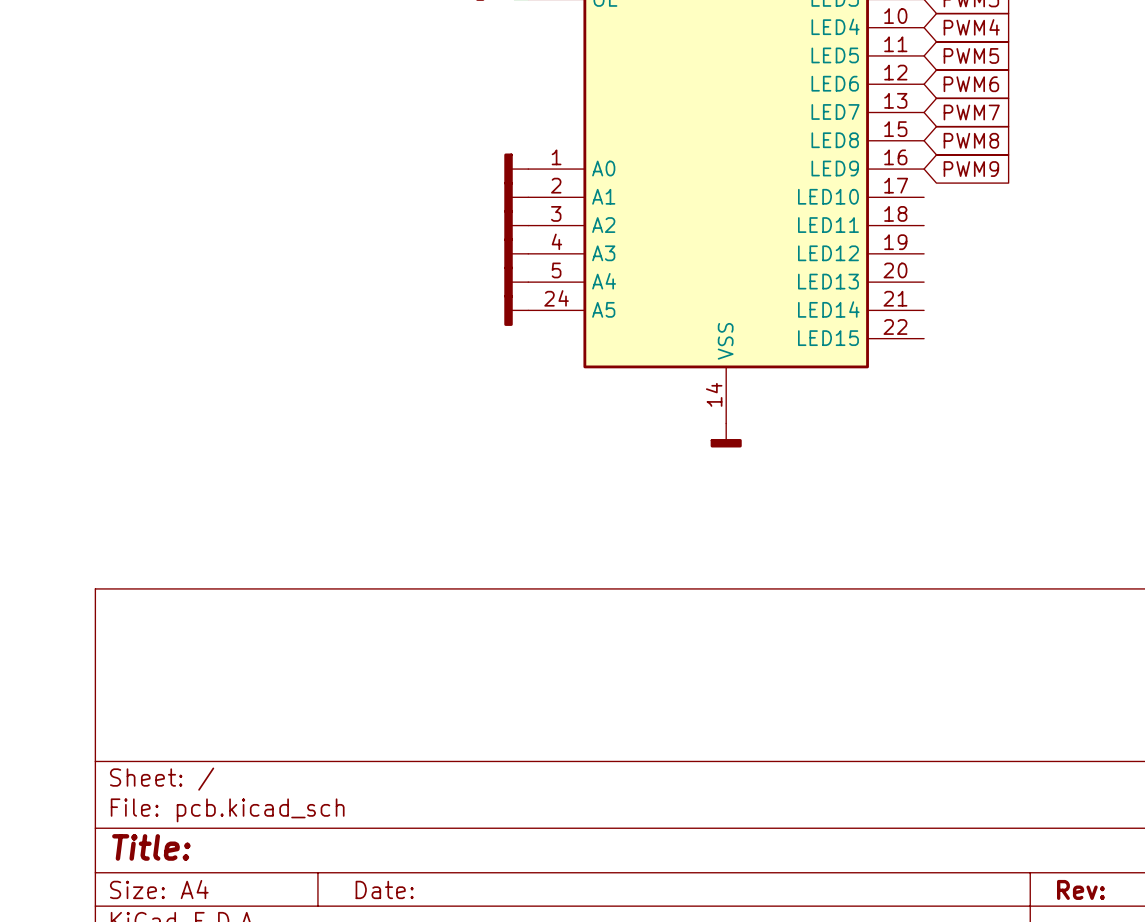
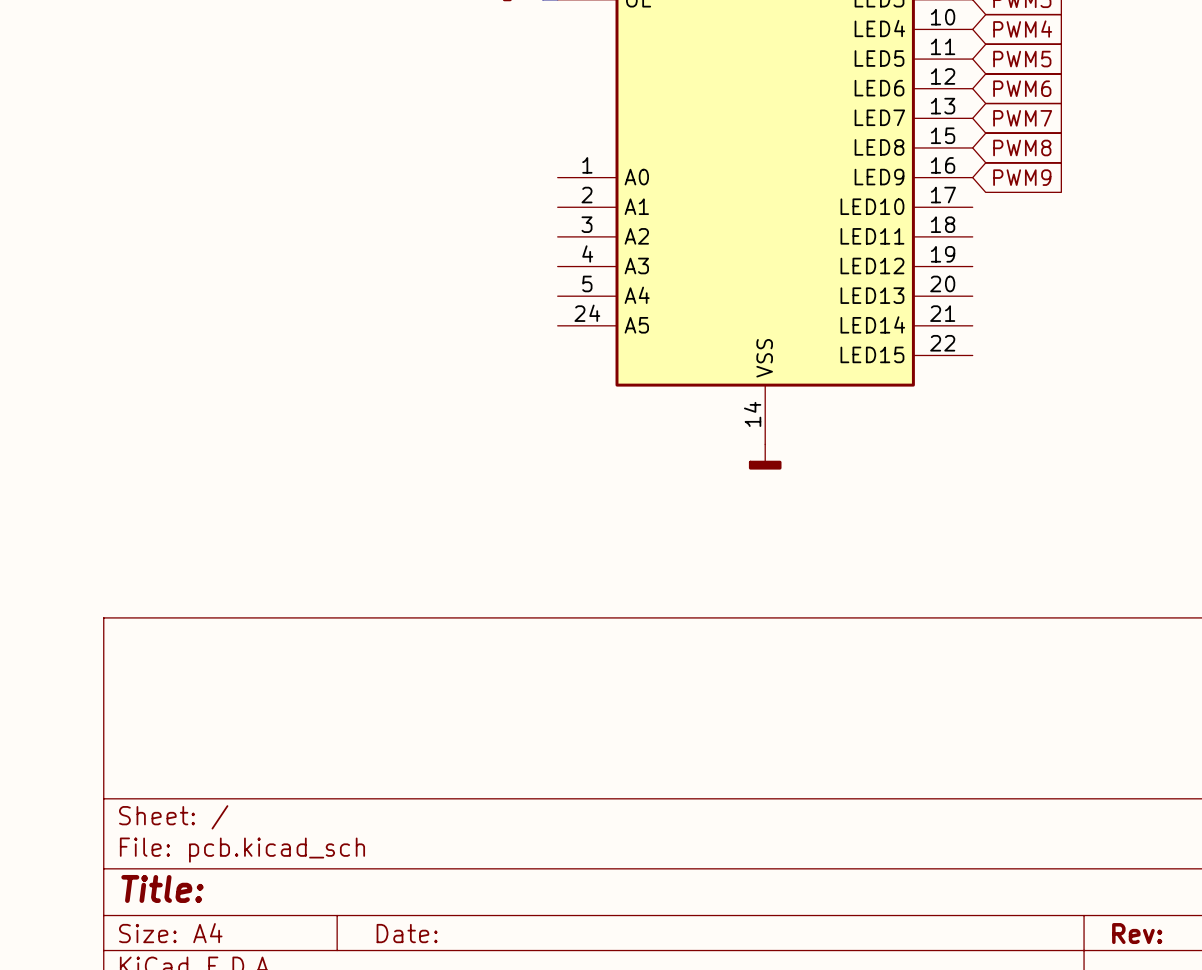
power symbol: (516, 169) -> none
power symbol: (516, 197) -> none
power symbol: (516, 225) -> none
power symbol: (516, 253) -> none
power symbol: (516, 282) -> none
power symbol: (516, 310) -> none

